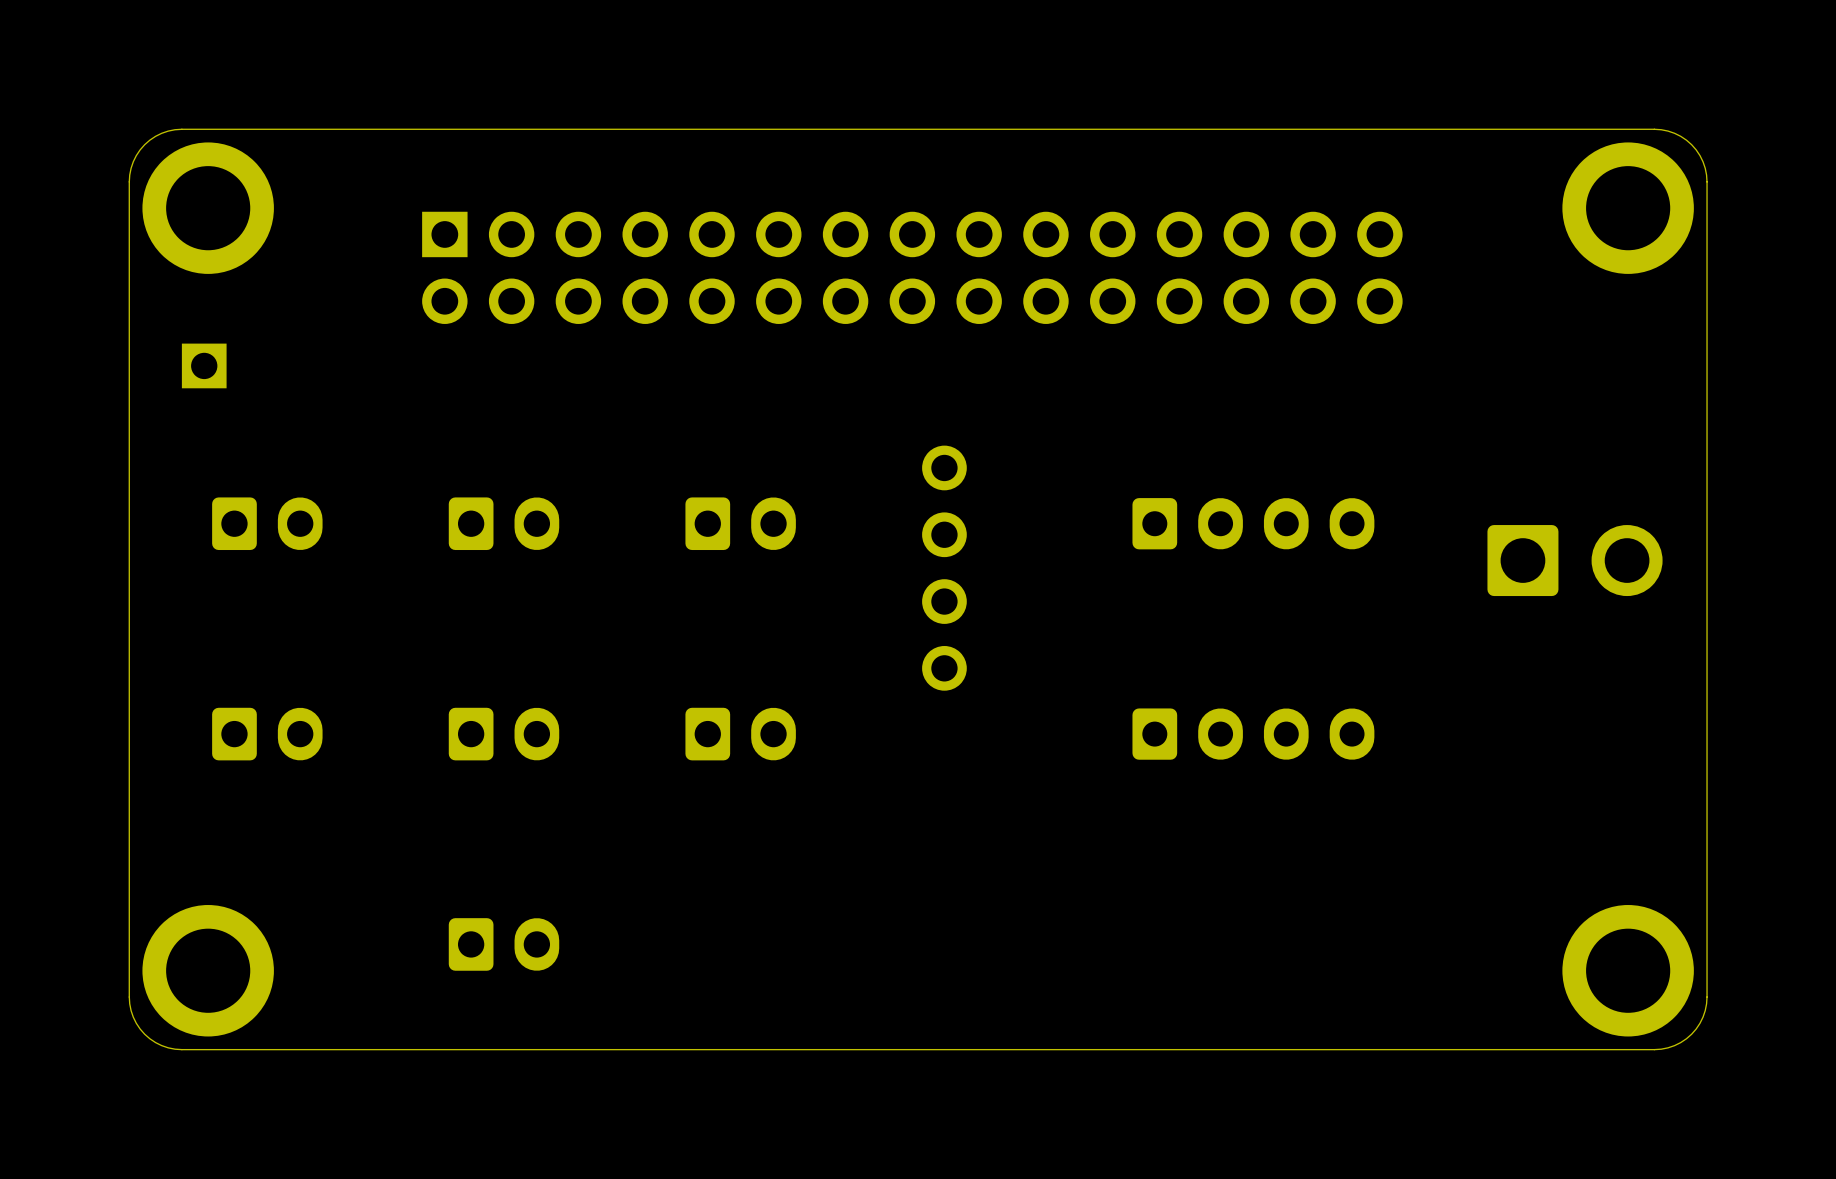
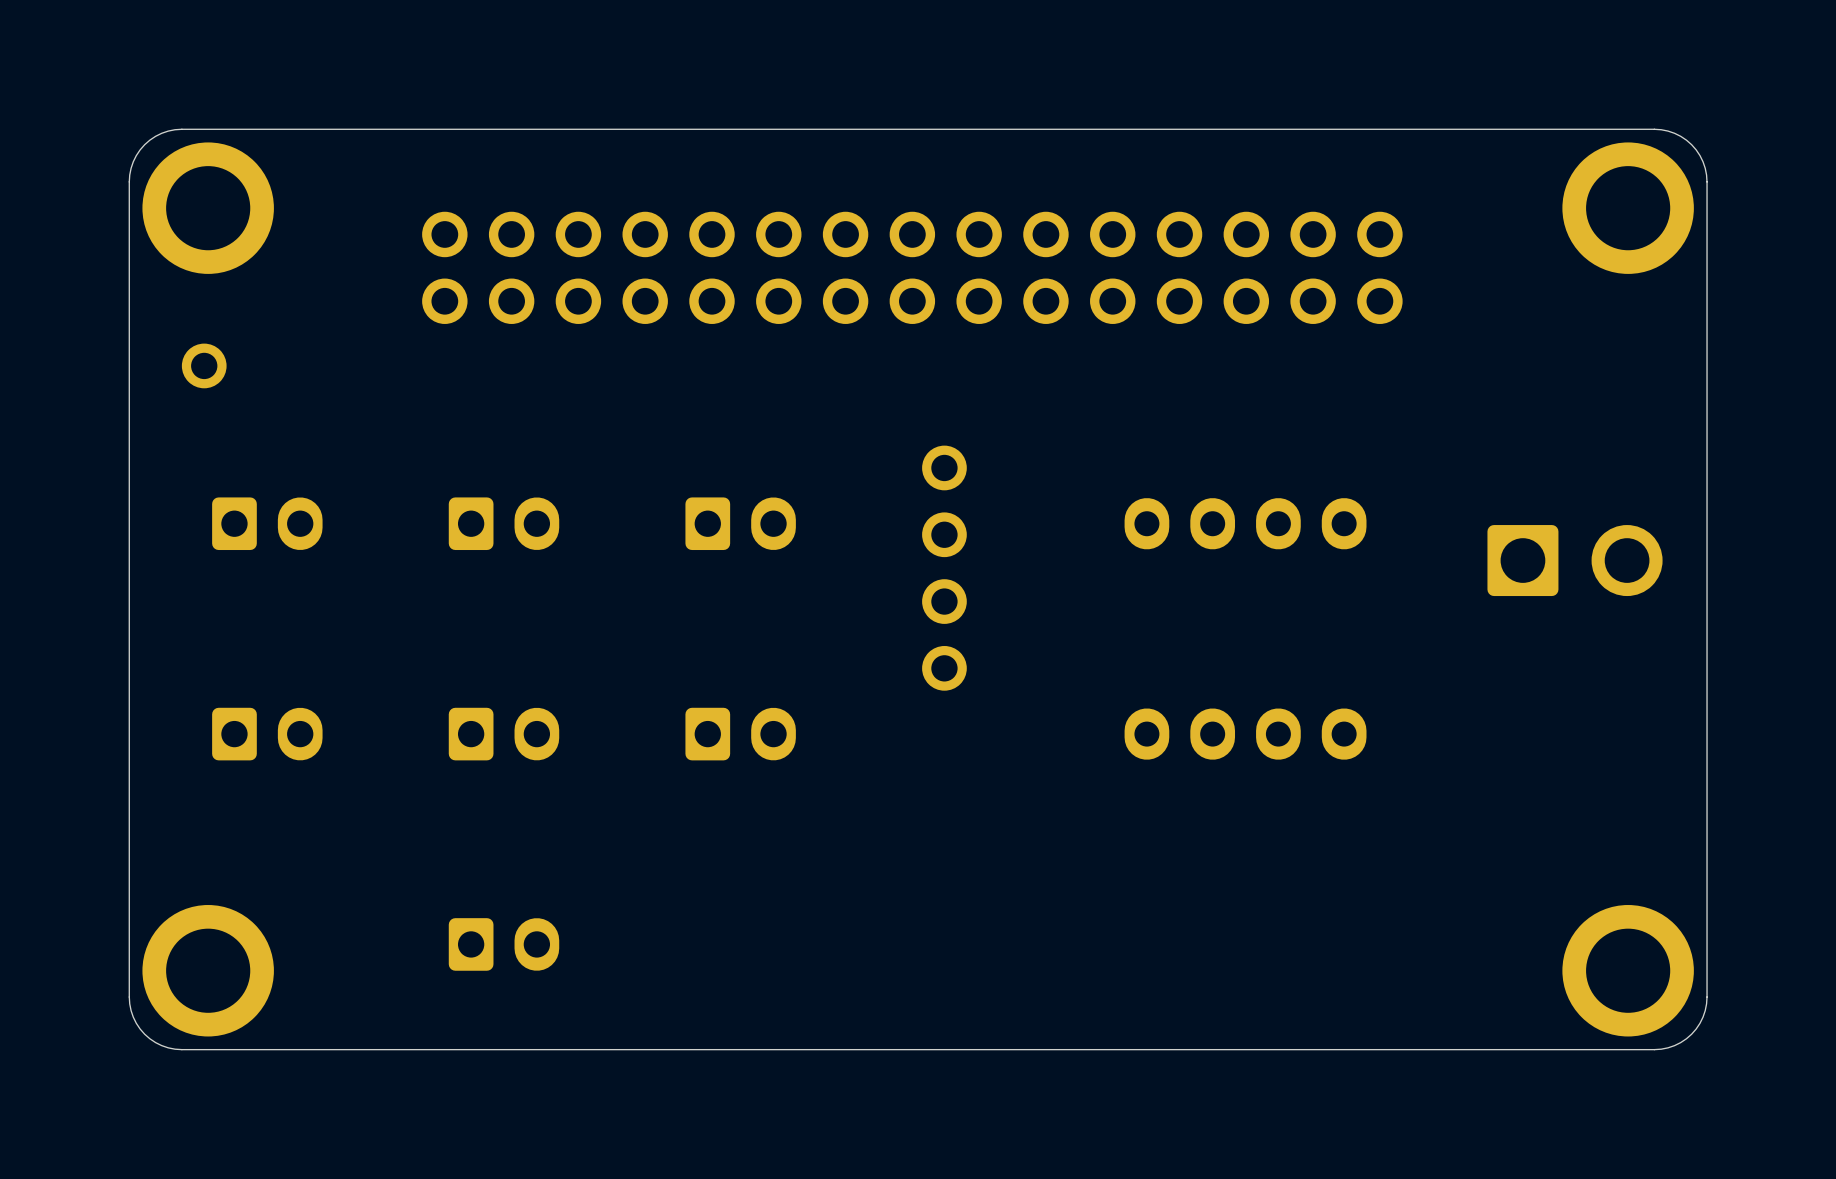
part footprint: [422, 211, 1403, 324] -> [422, 211, 1403, 324]
part footprint: [181, 343, 227, 389] -> [181, 343, 227, 389]
part footprint: [1132, 498, 1375, 550] -> [1124, 498, 1367, 550]
part footprint: [1132, 708, 1375, 760] -> [1124, 708, 1367, 760]

